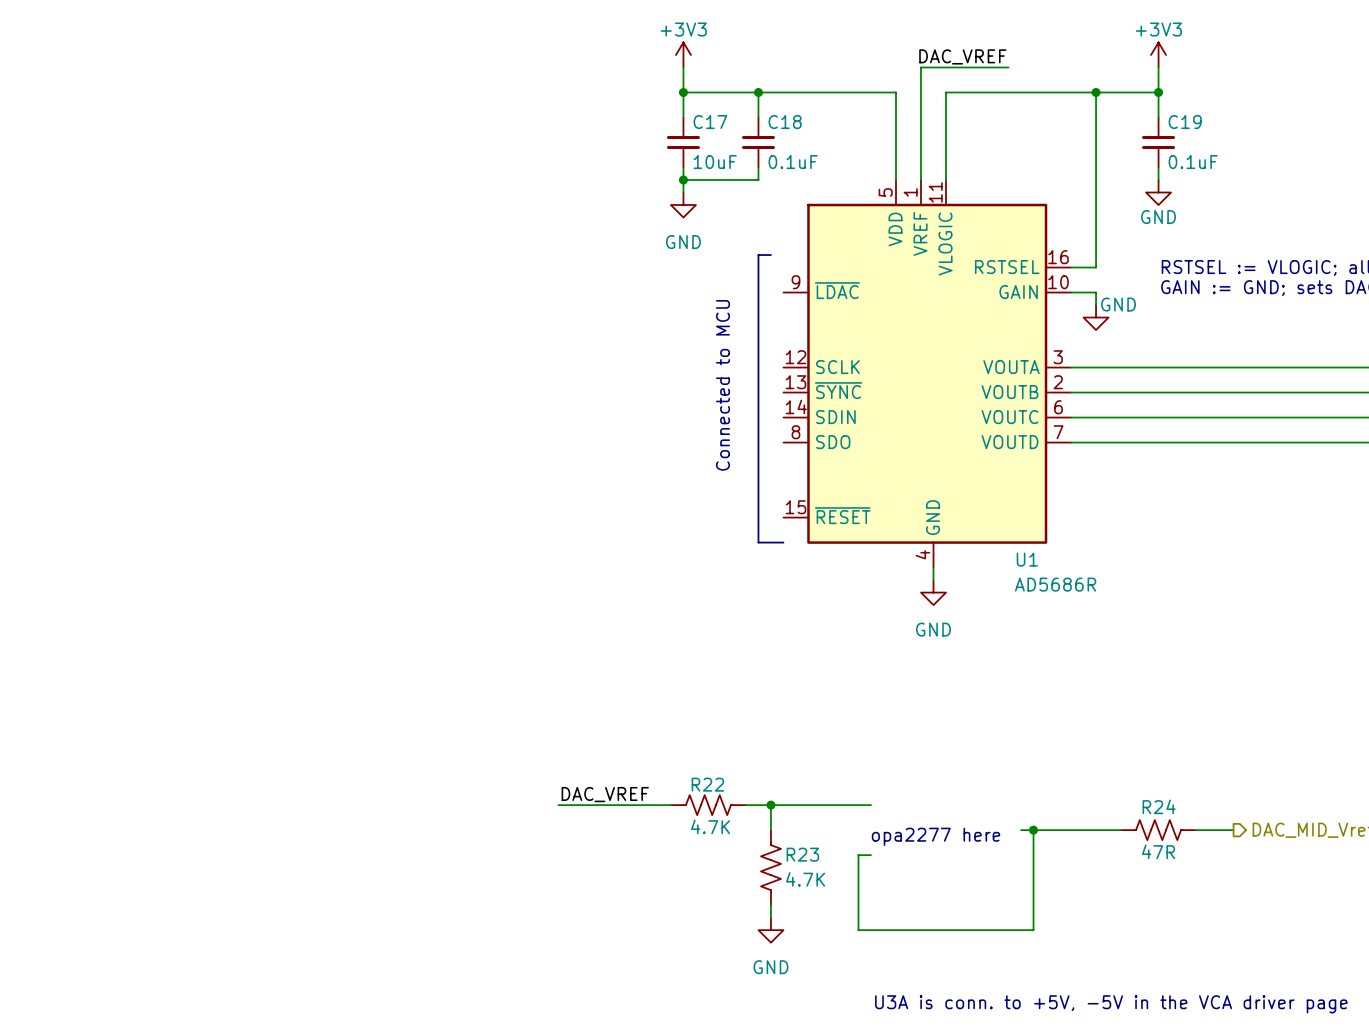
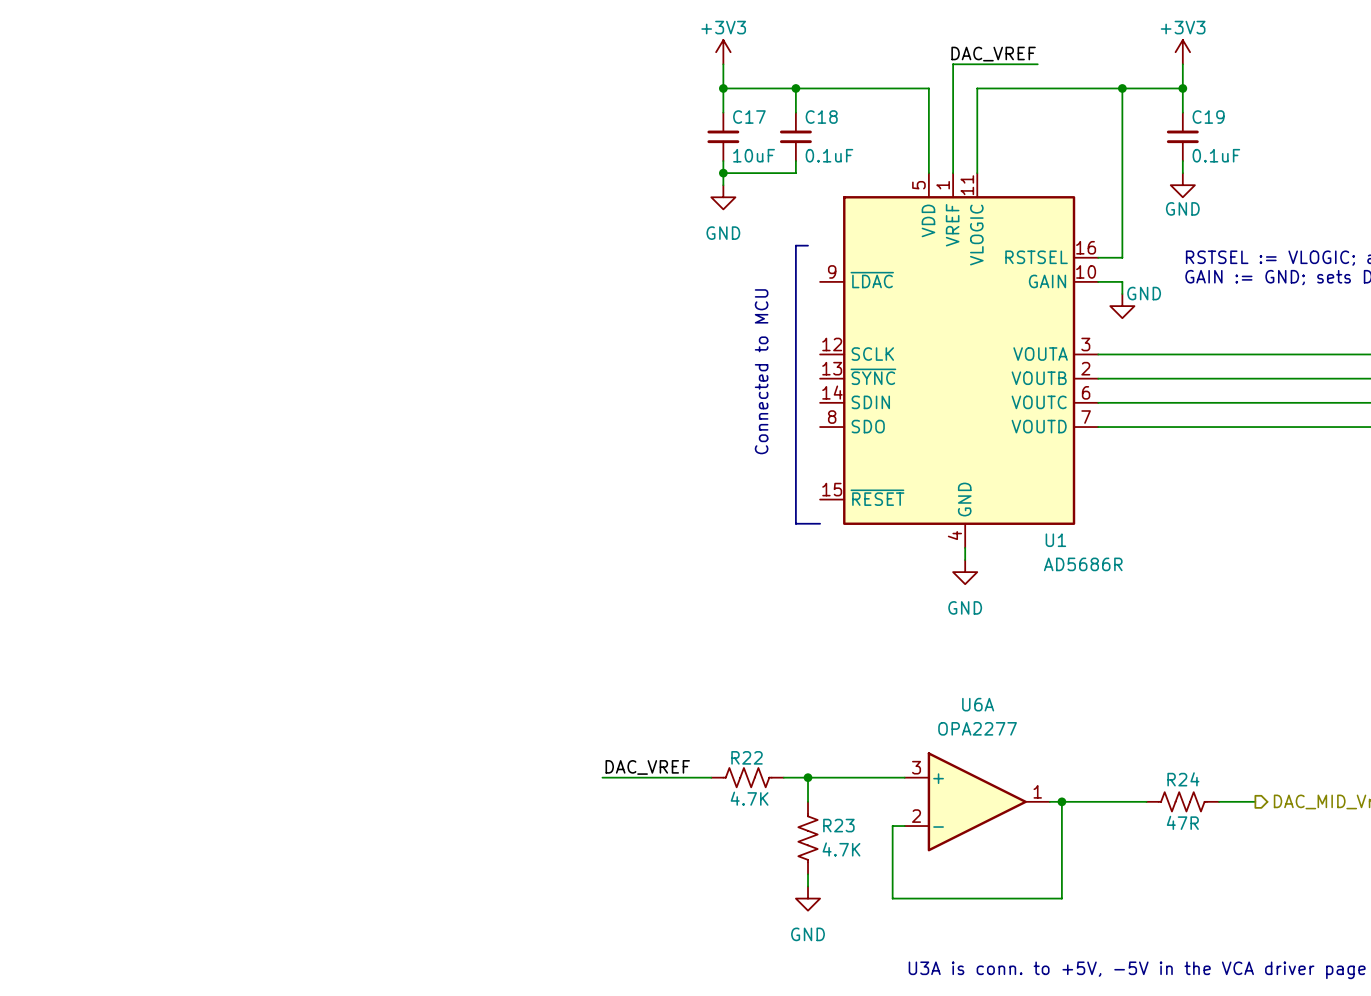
U6A: none -> OPA2277 (977, 801)
text: opa2277 here (936, 836) -> none

